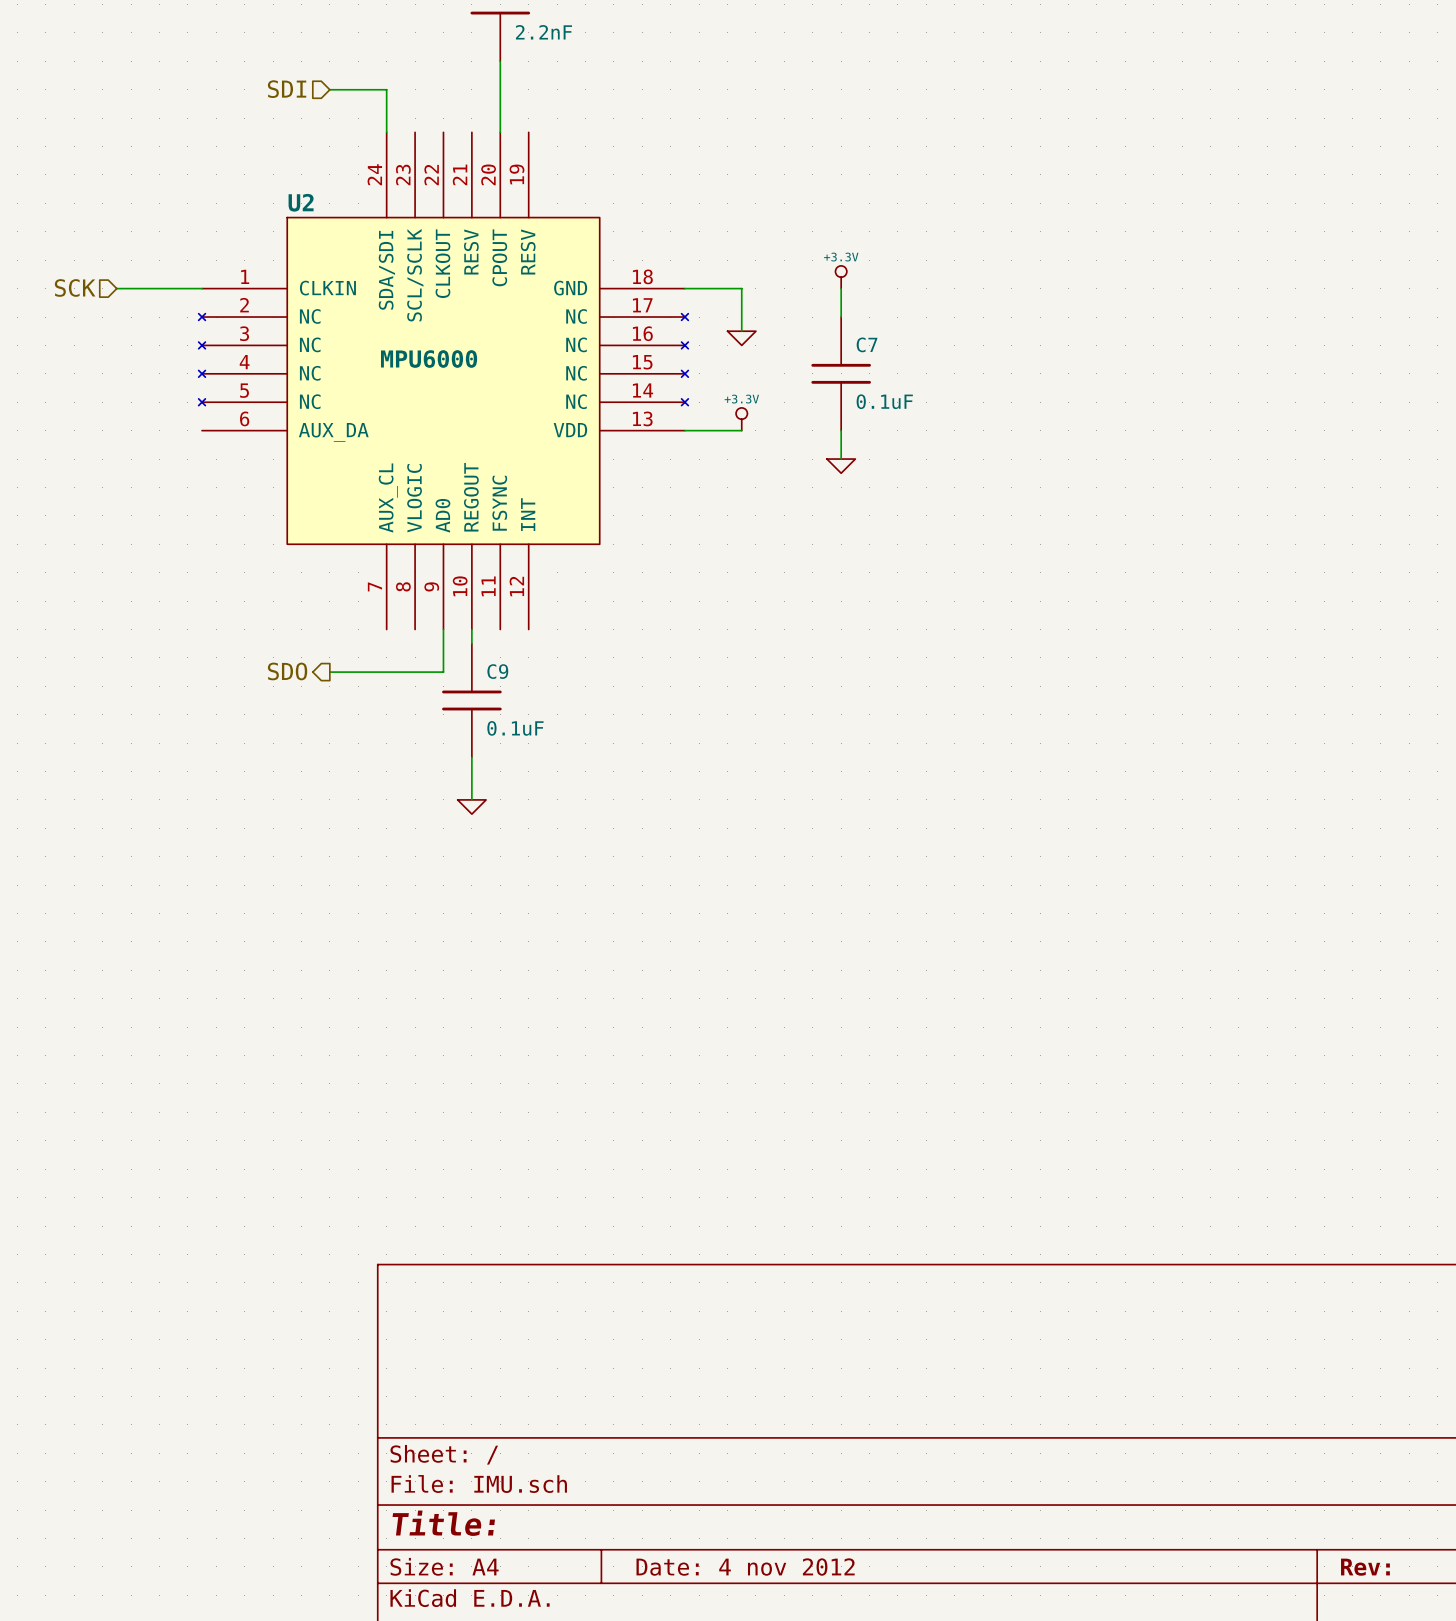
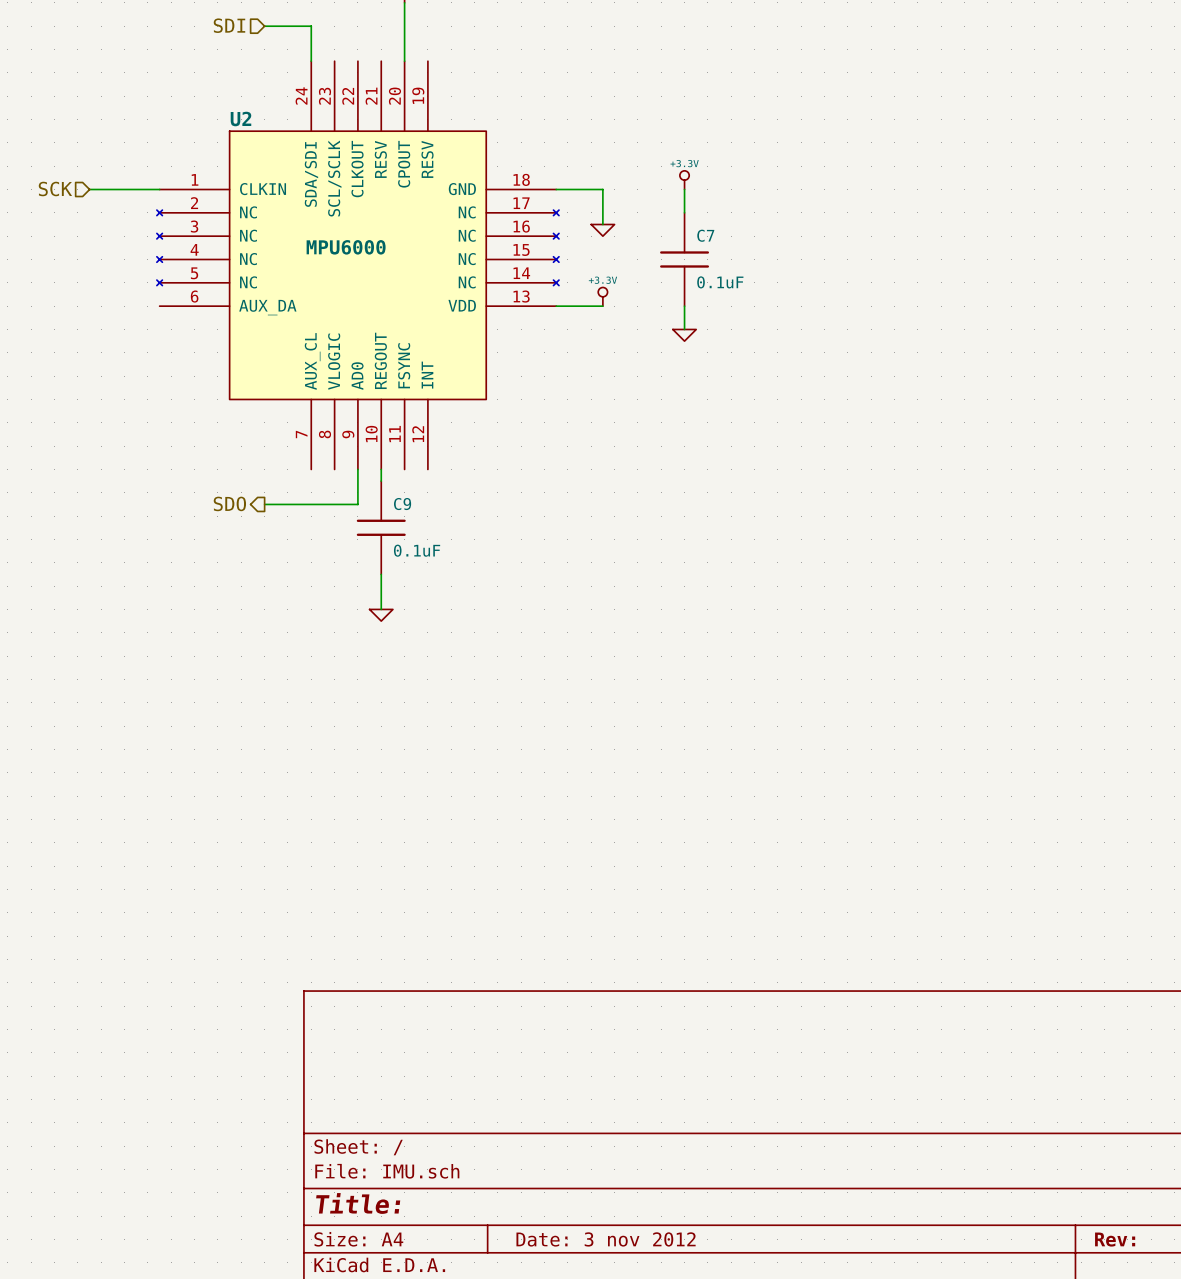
title block: Date: 4 nov 2012 (745, 1567) -> Date: 3 nov 2012 (606, 1239)

